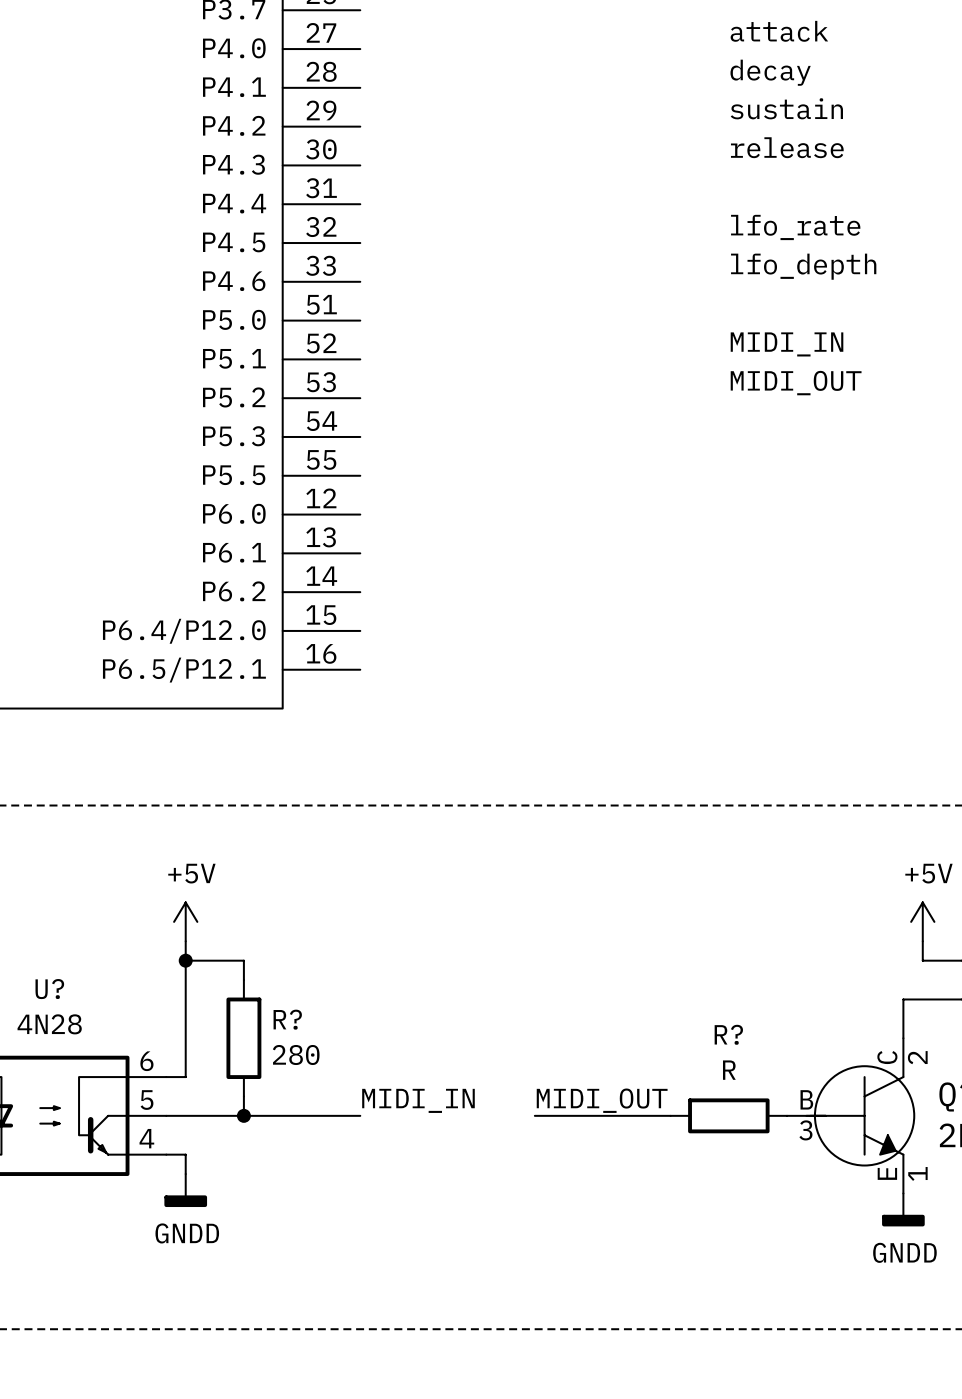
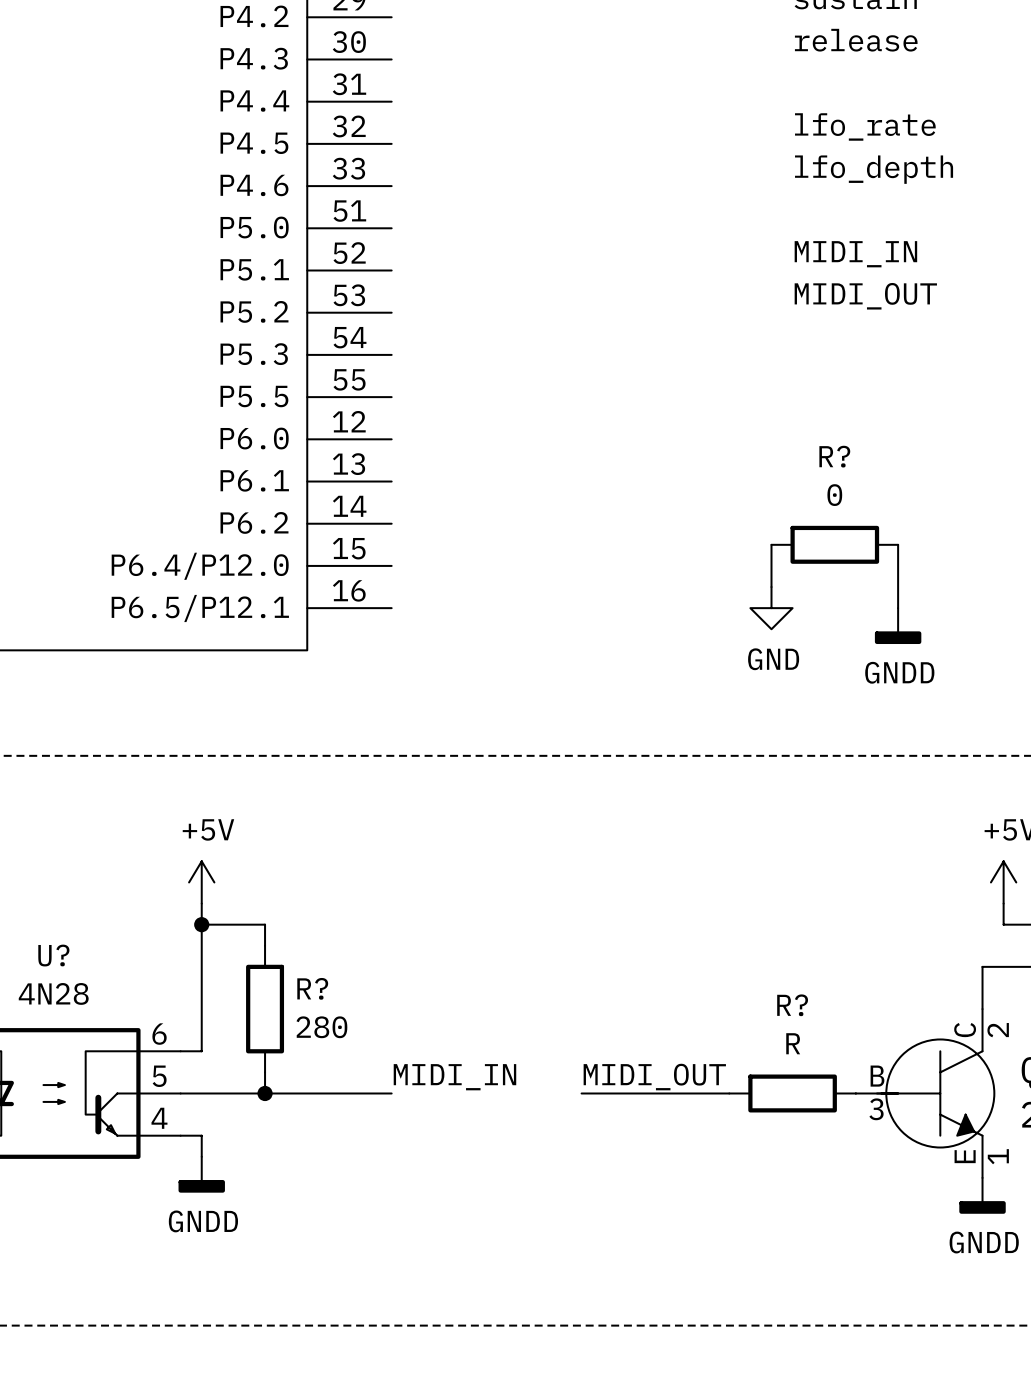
wire: none -> (771, 544) (771, 587)
R?: none -> 0 (834, 544)
wire: none -> (898, 544) (898, 608)
power symbol: none -> GND (771, 608)
power symbol: none -> GNDD (898, 626)

